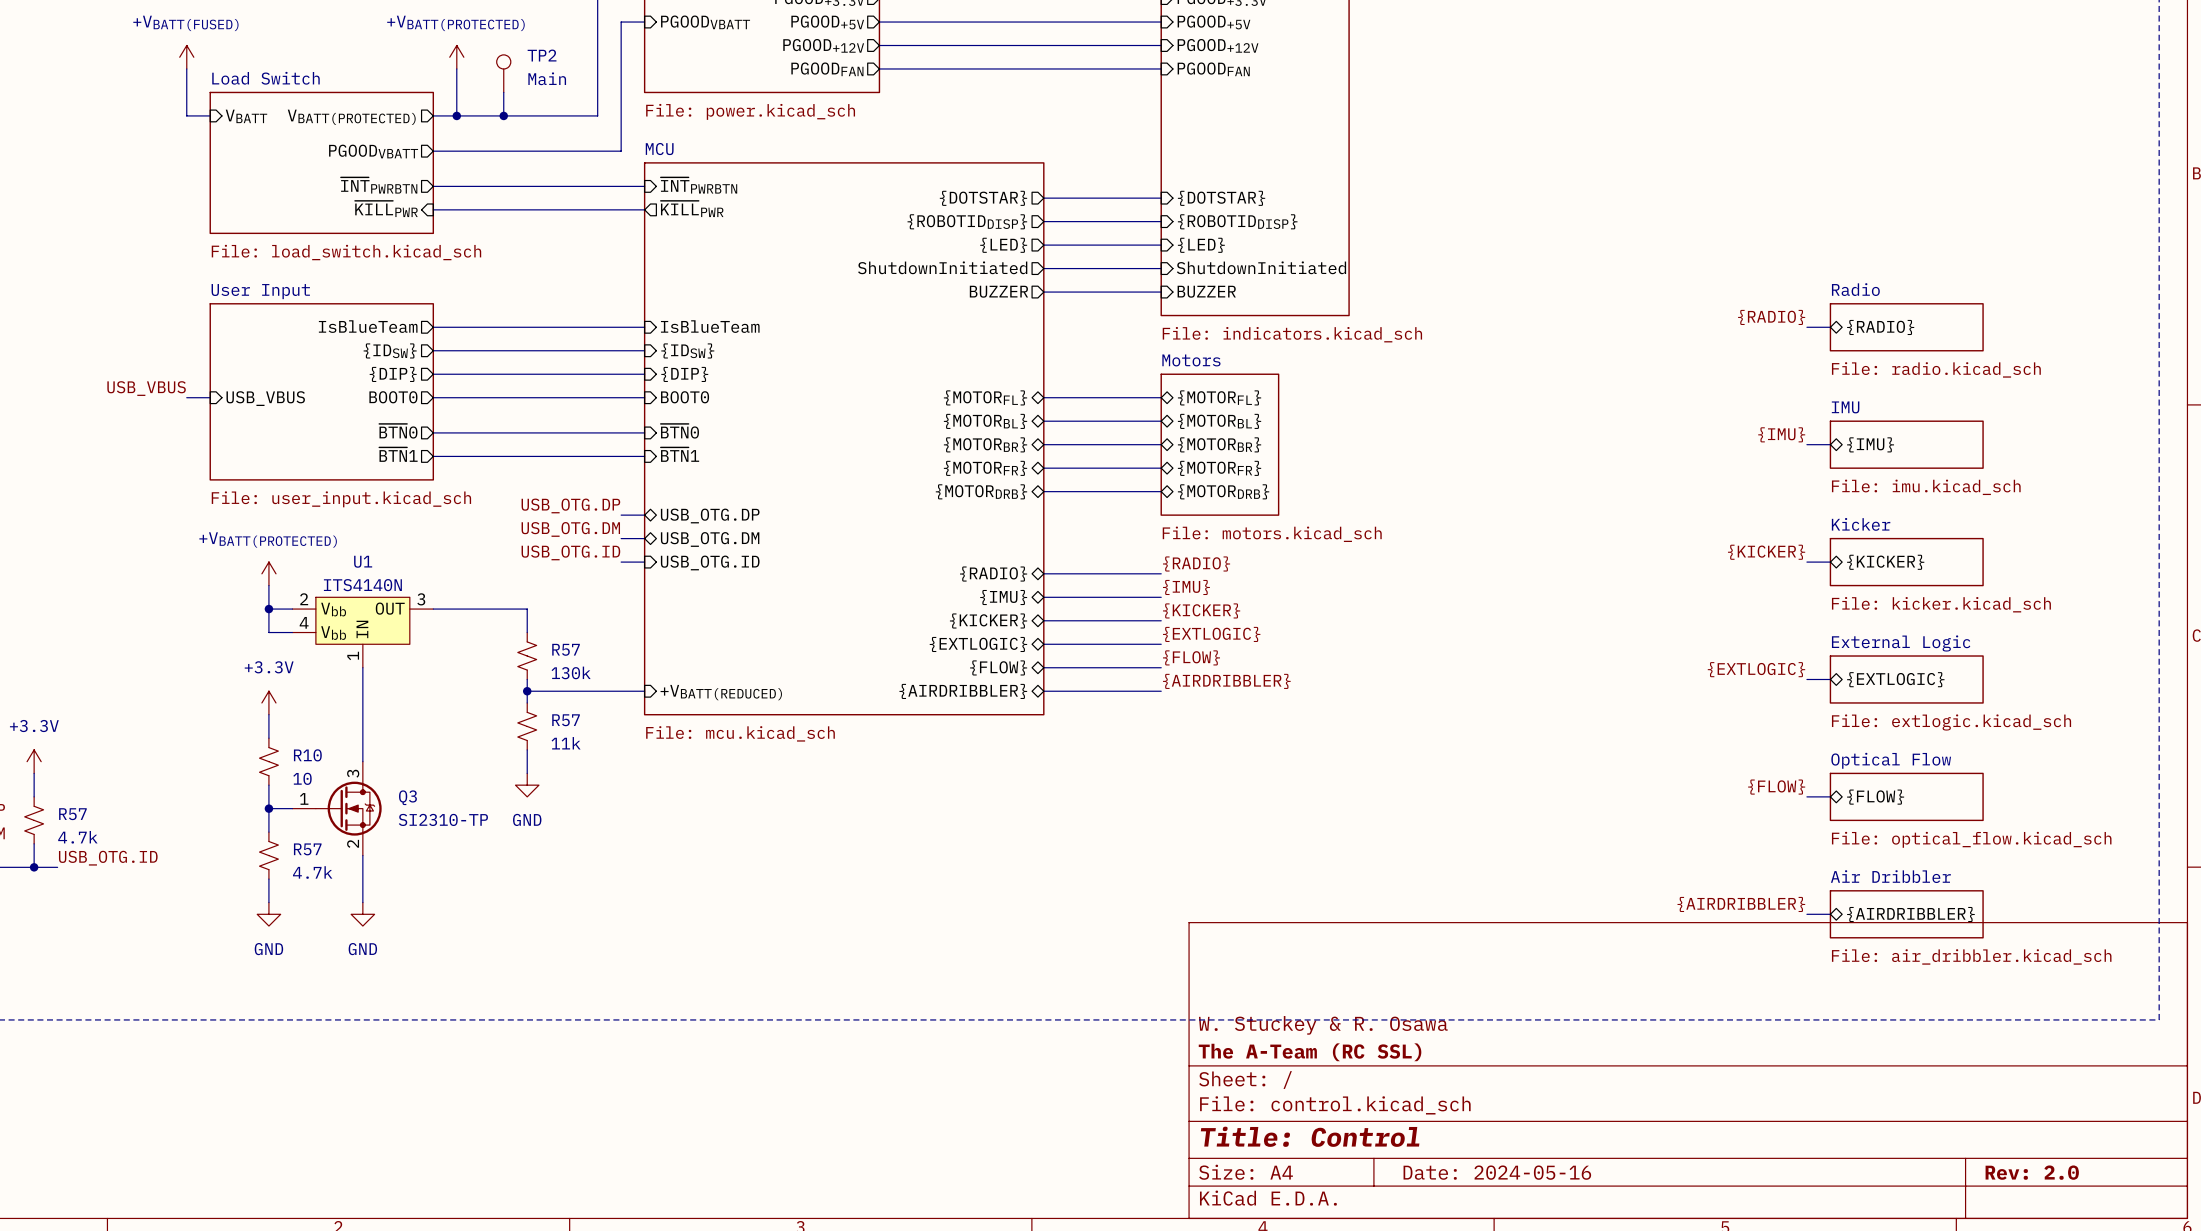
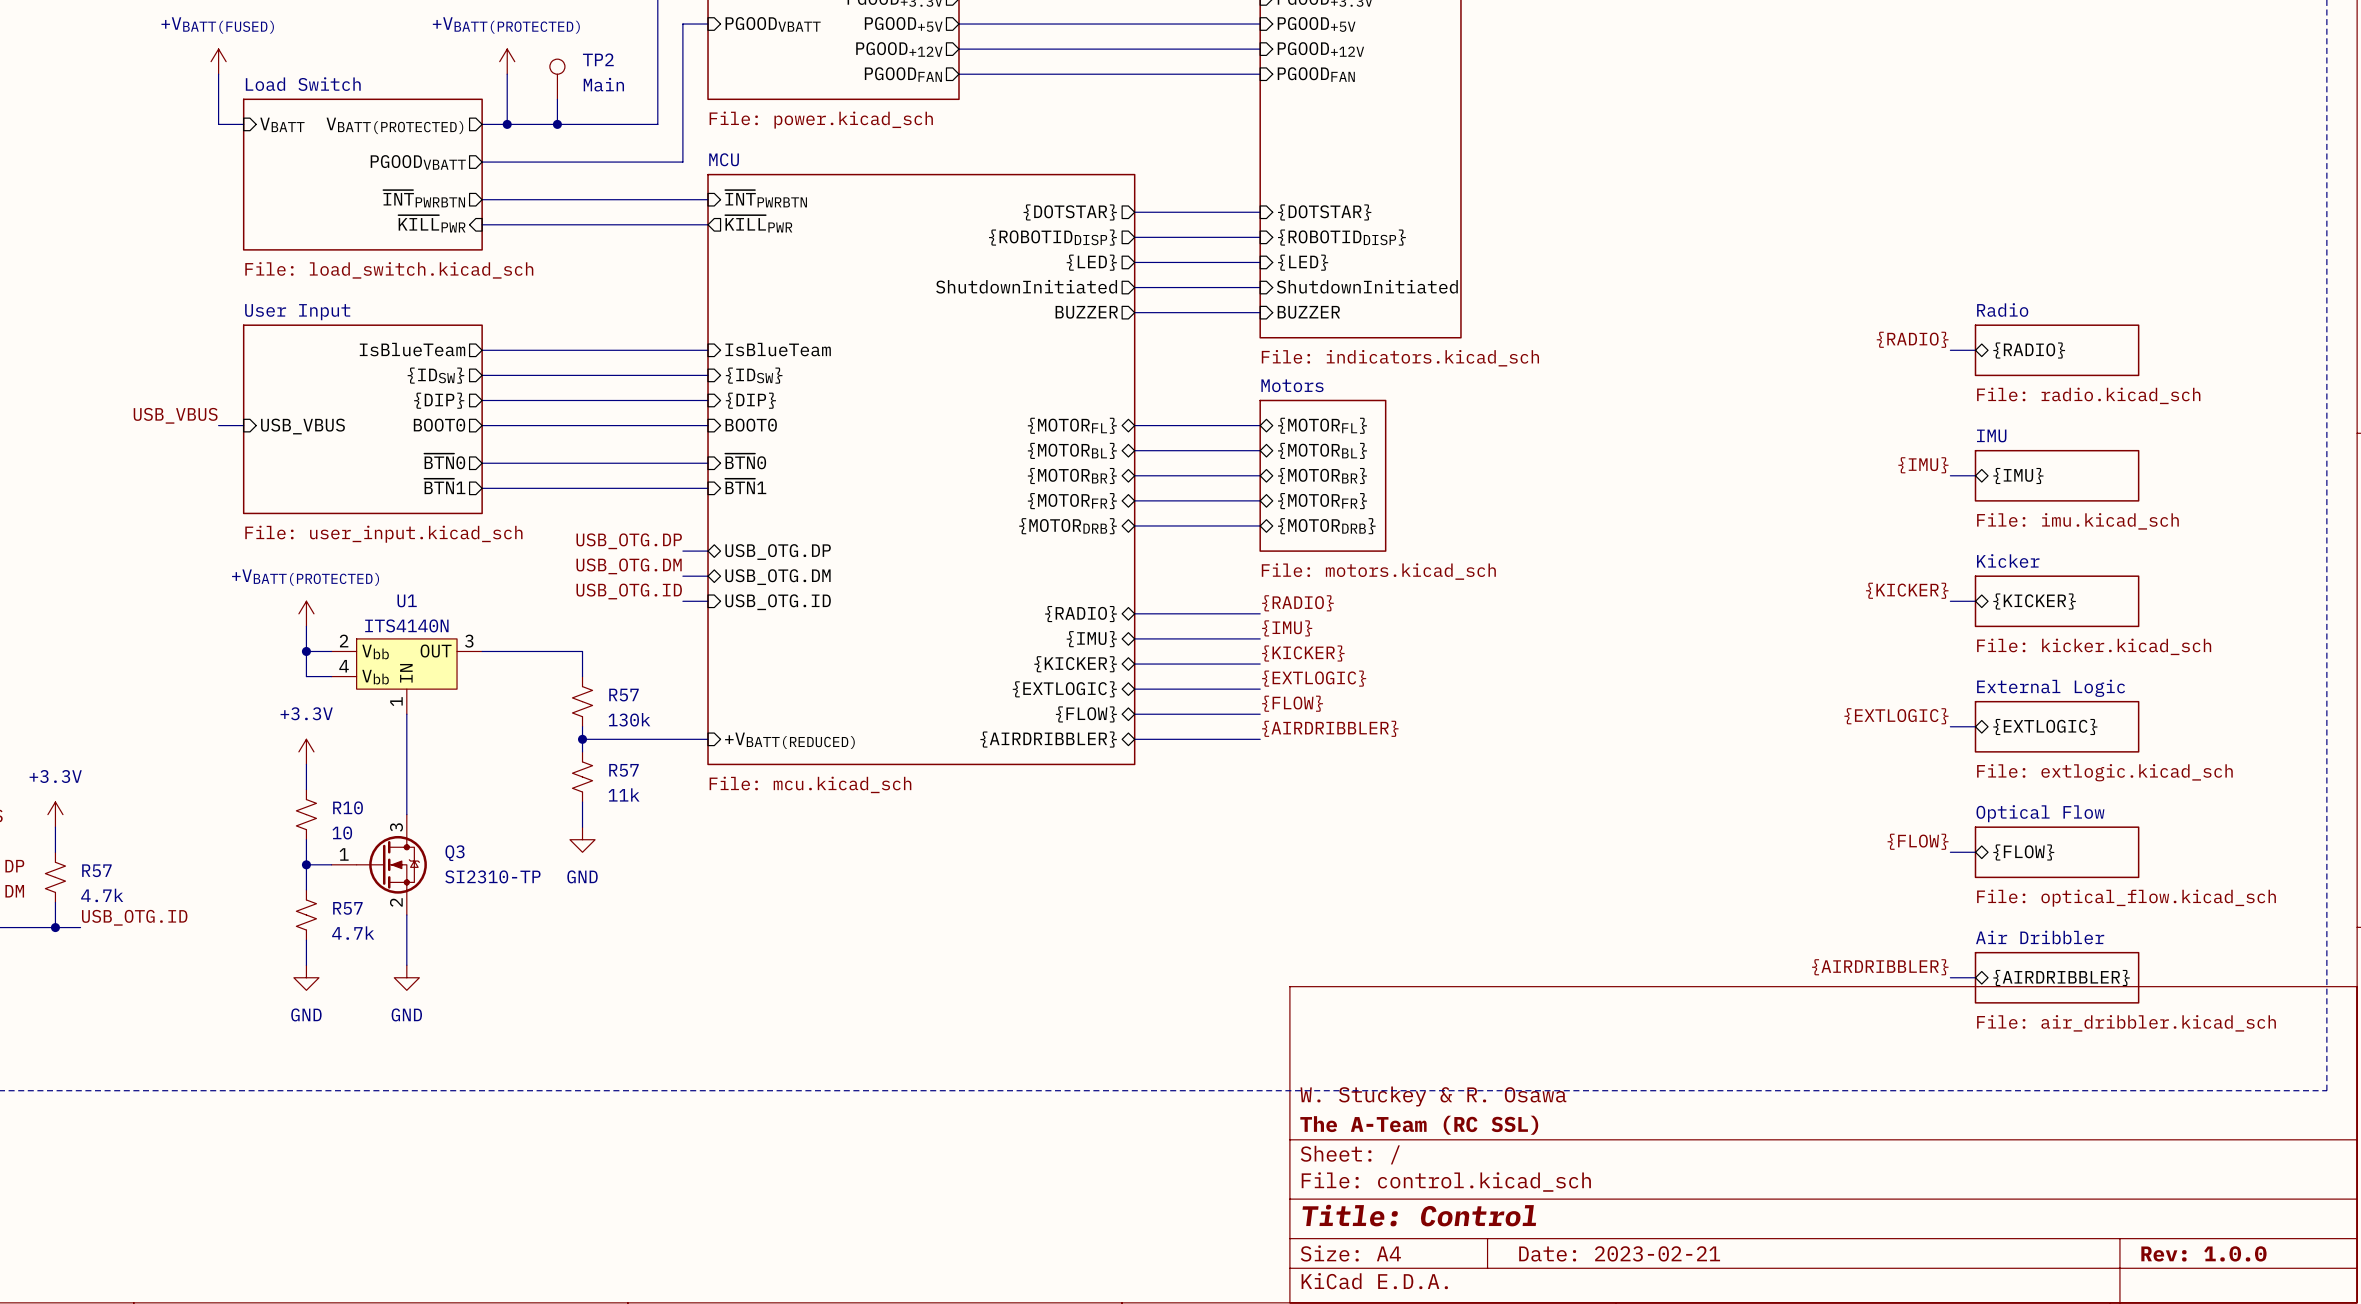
title block: Date: 2024-05-16 (1497, 1172) -> Date: 2023-02-21 (1619, 1253)
title block: Rev: 2.0 (2032, 1172) -> Rev: 1.0.0 (2203, 1253)

